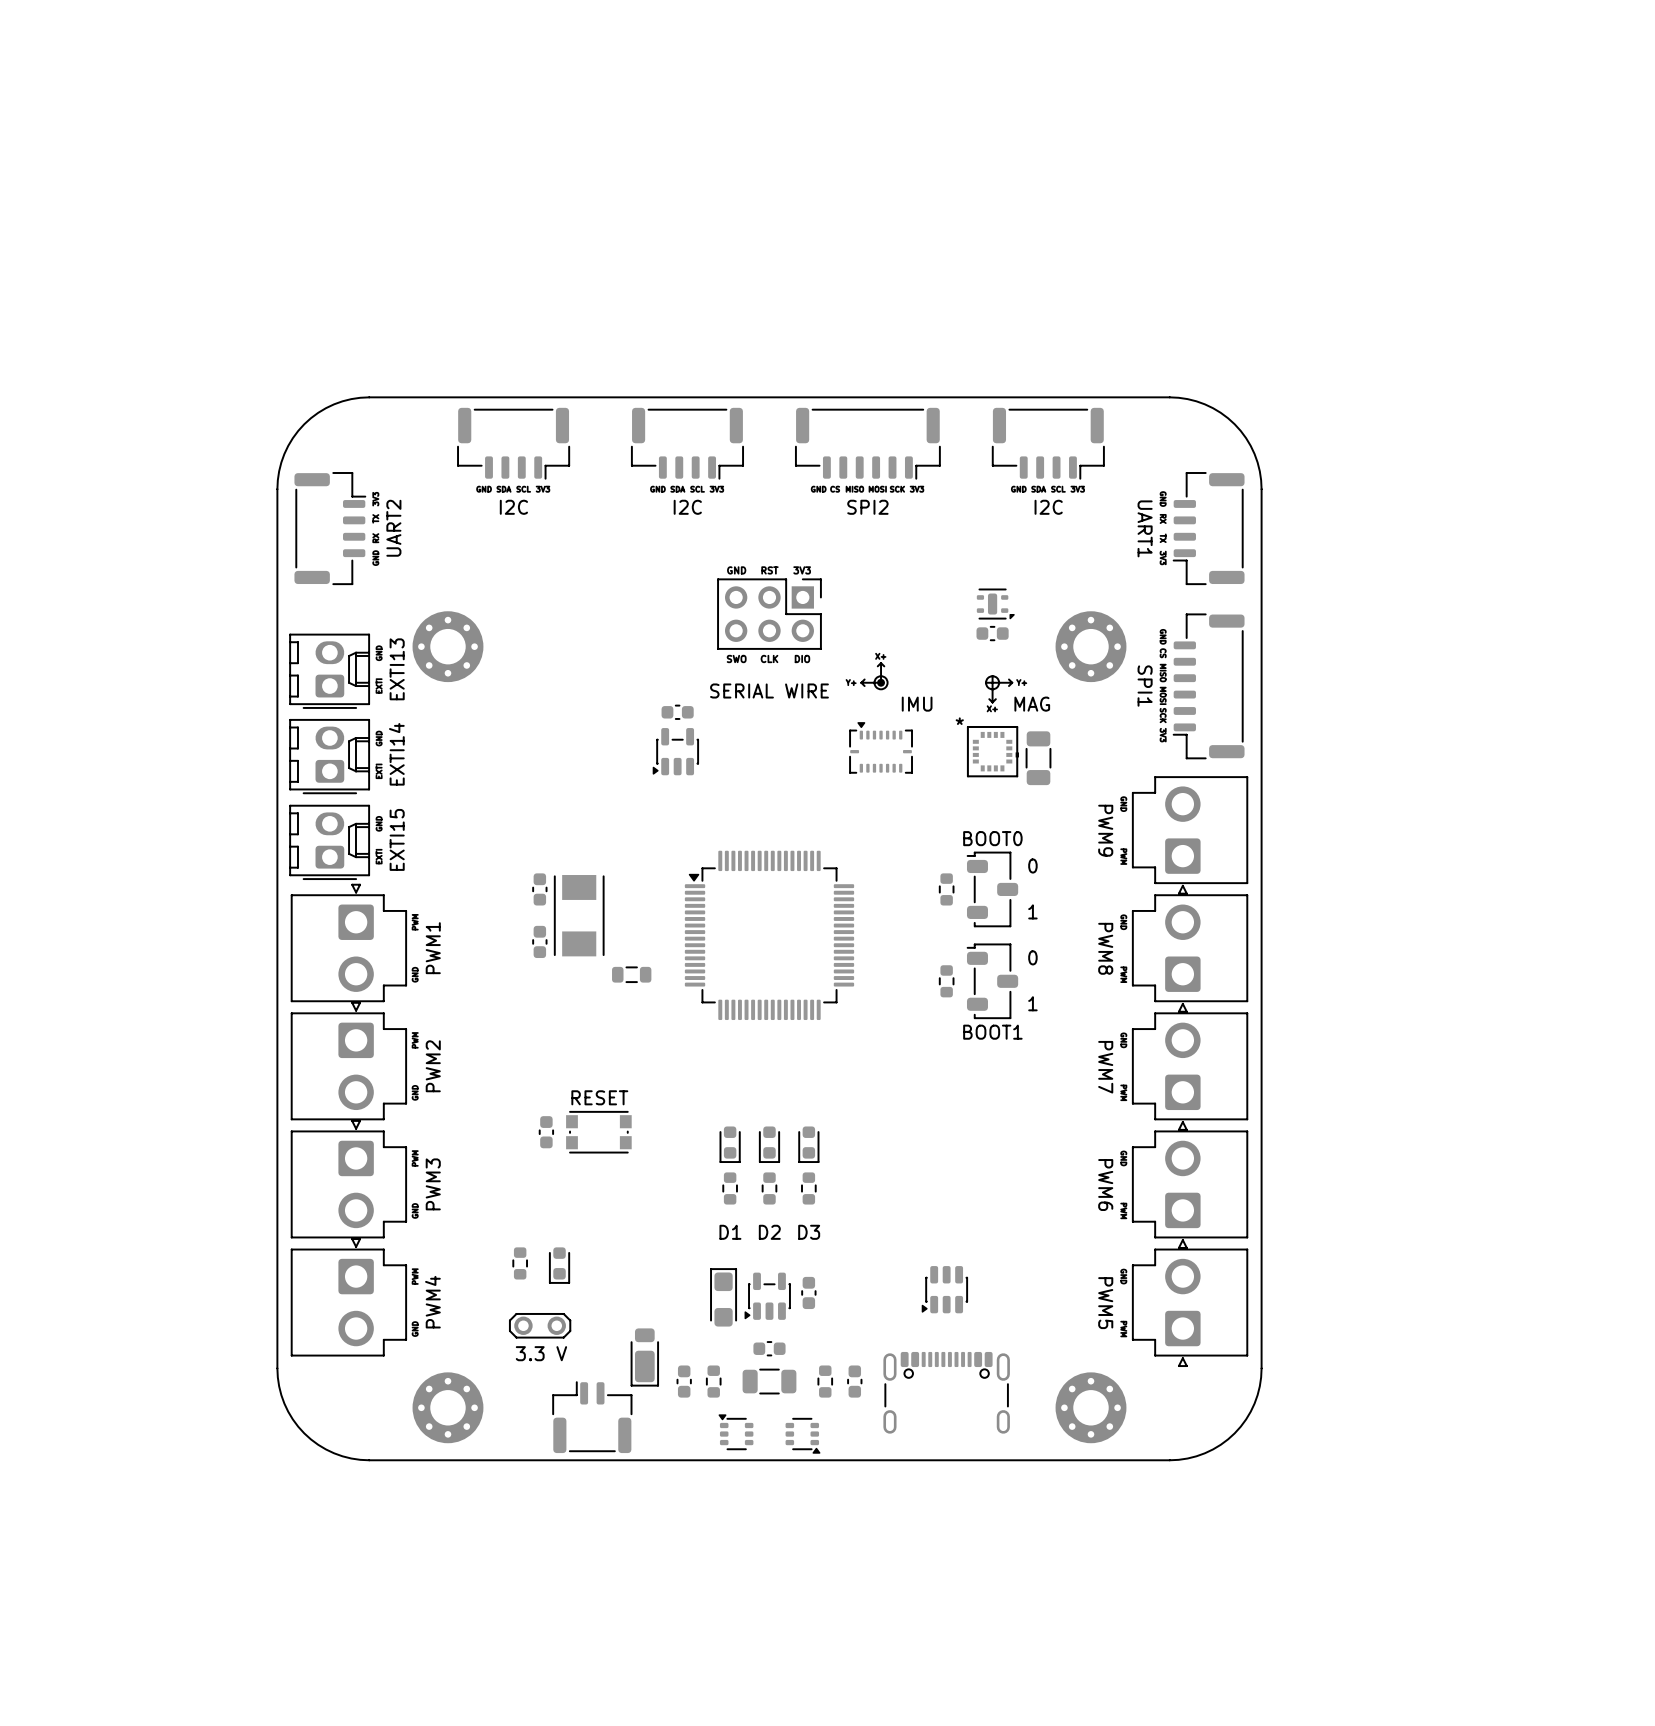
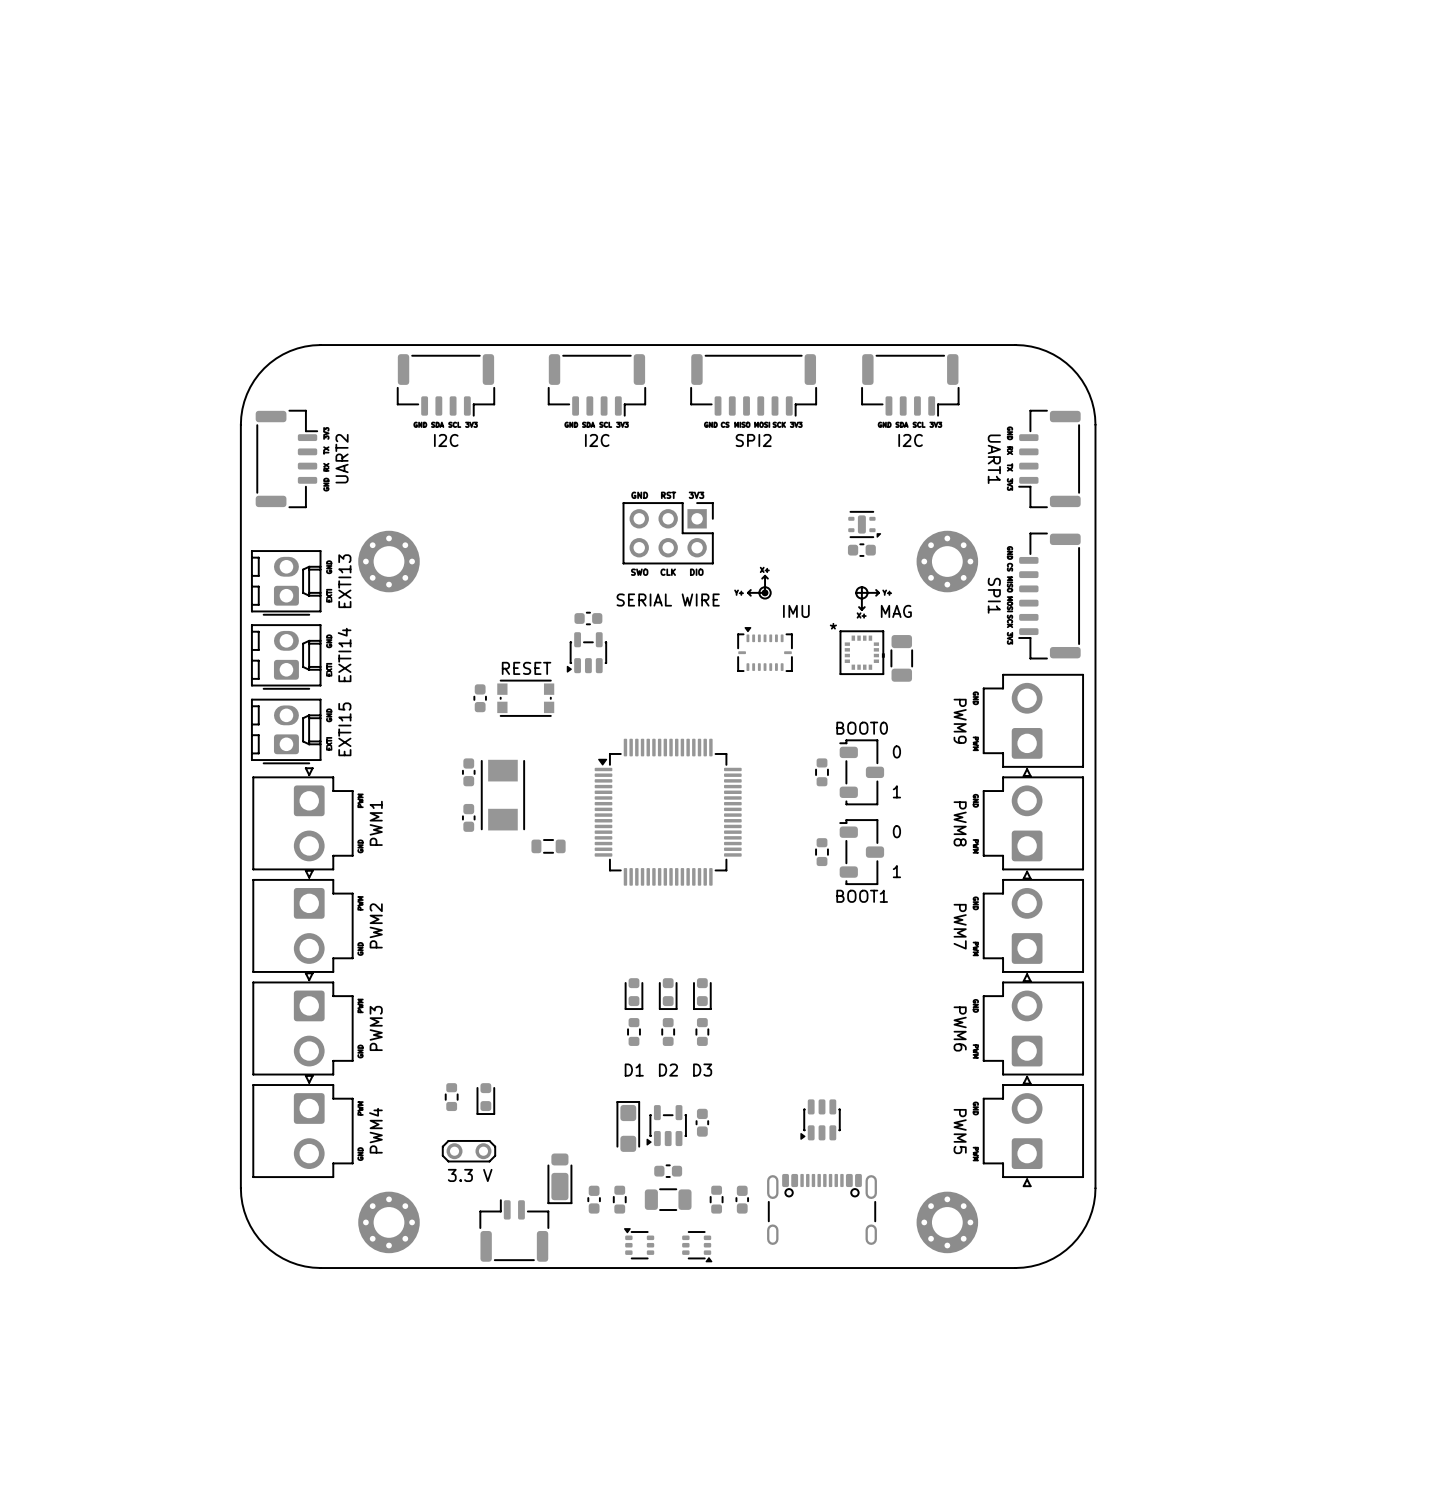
text: none -> RESET (526, 668)
part: none -> (480, 698)
part: none -> (525, 698)
text: RESET (599, 1097) -> none
part: (546, 1132) -> none
part: (598, 1132) -> none

